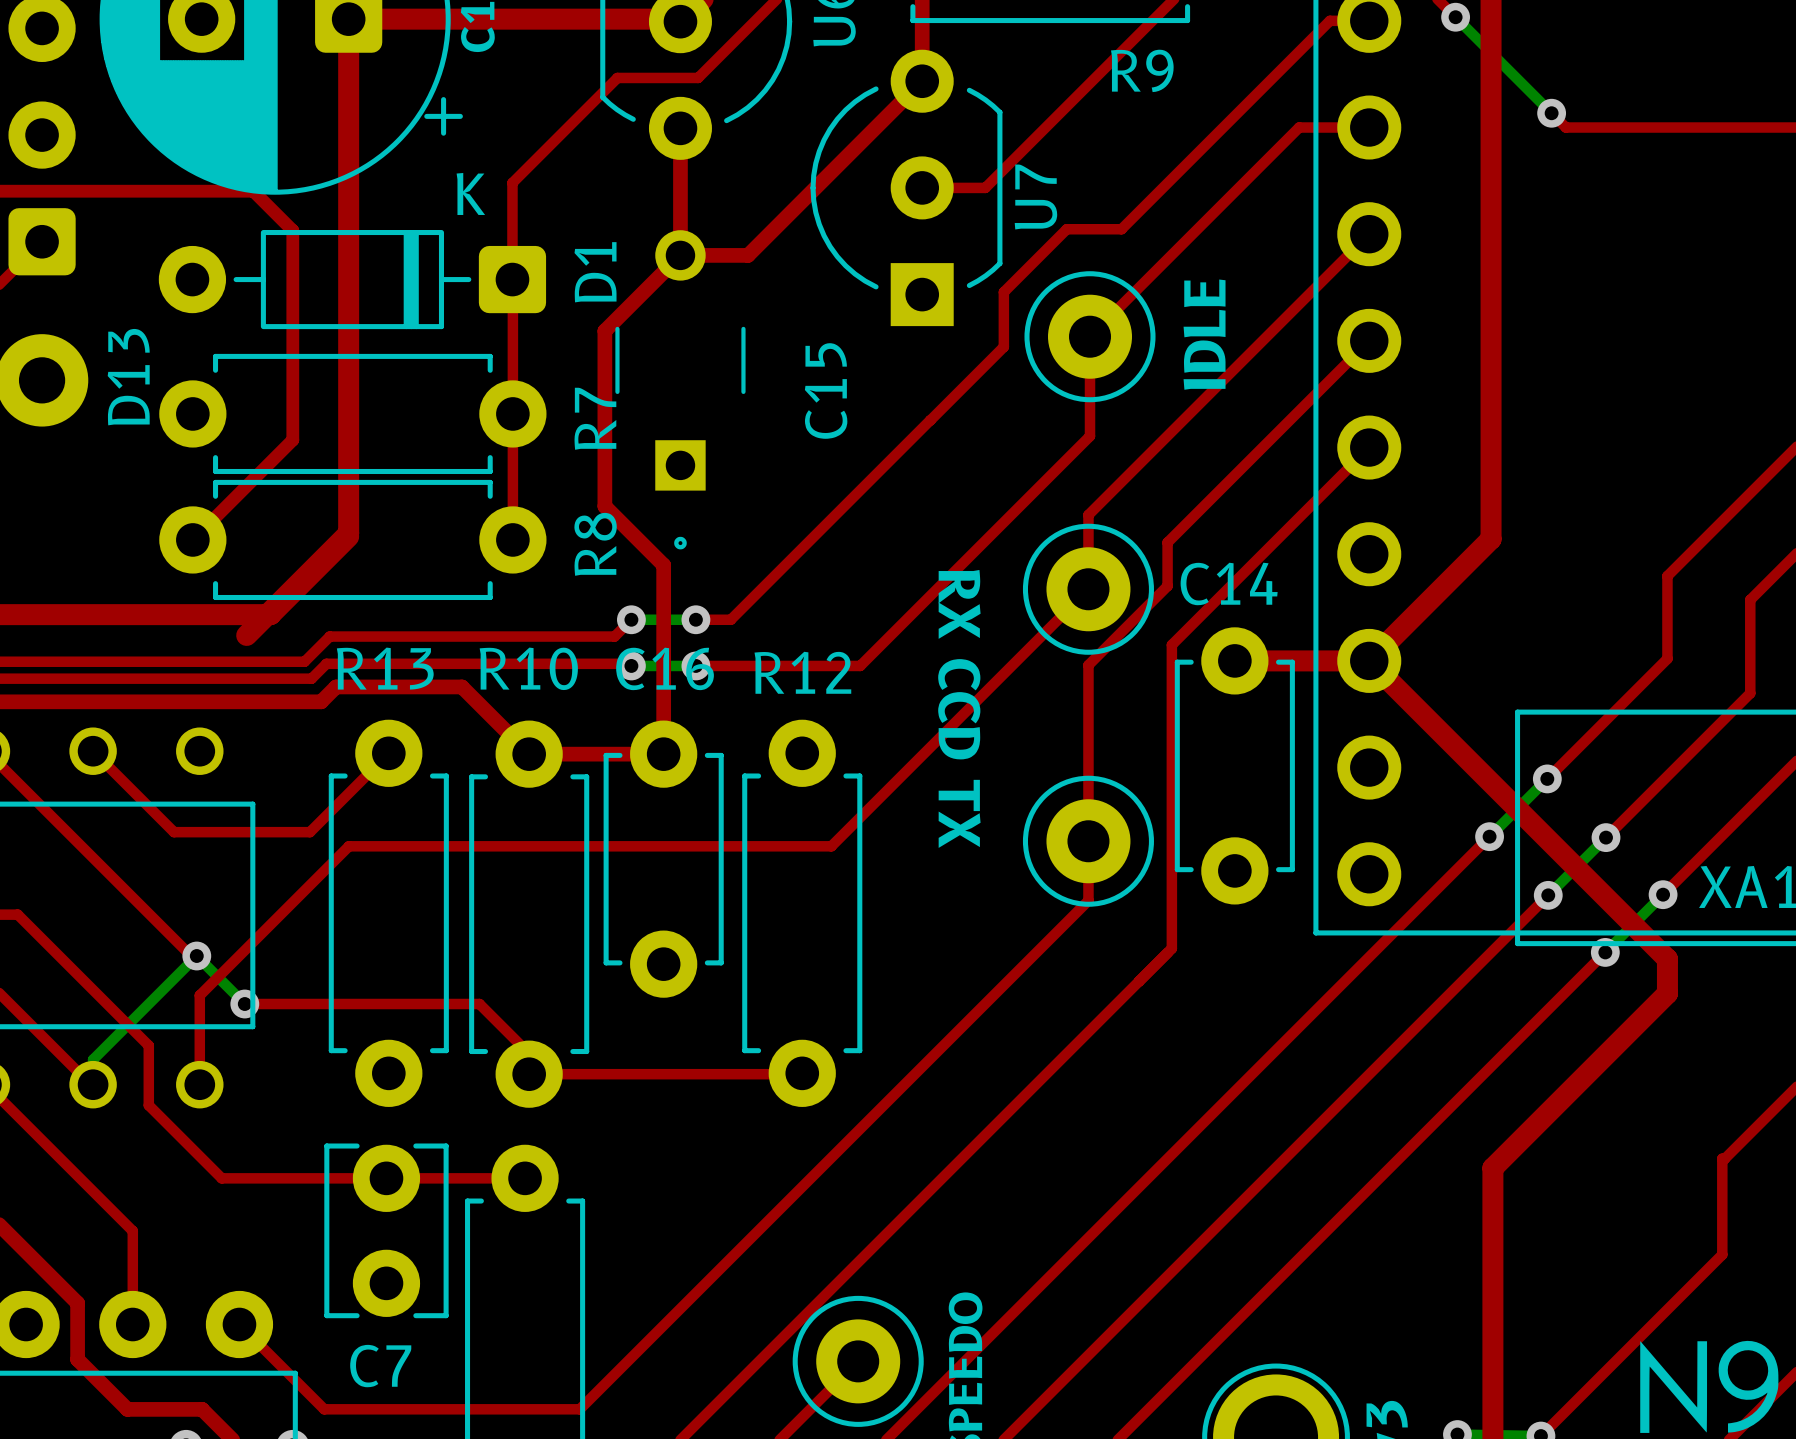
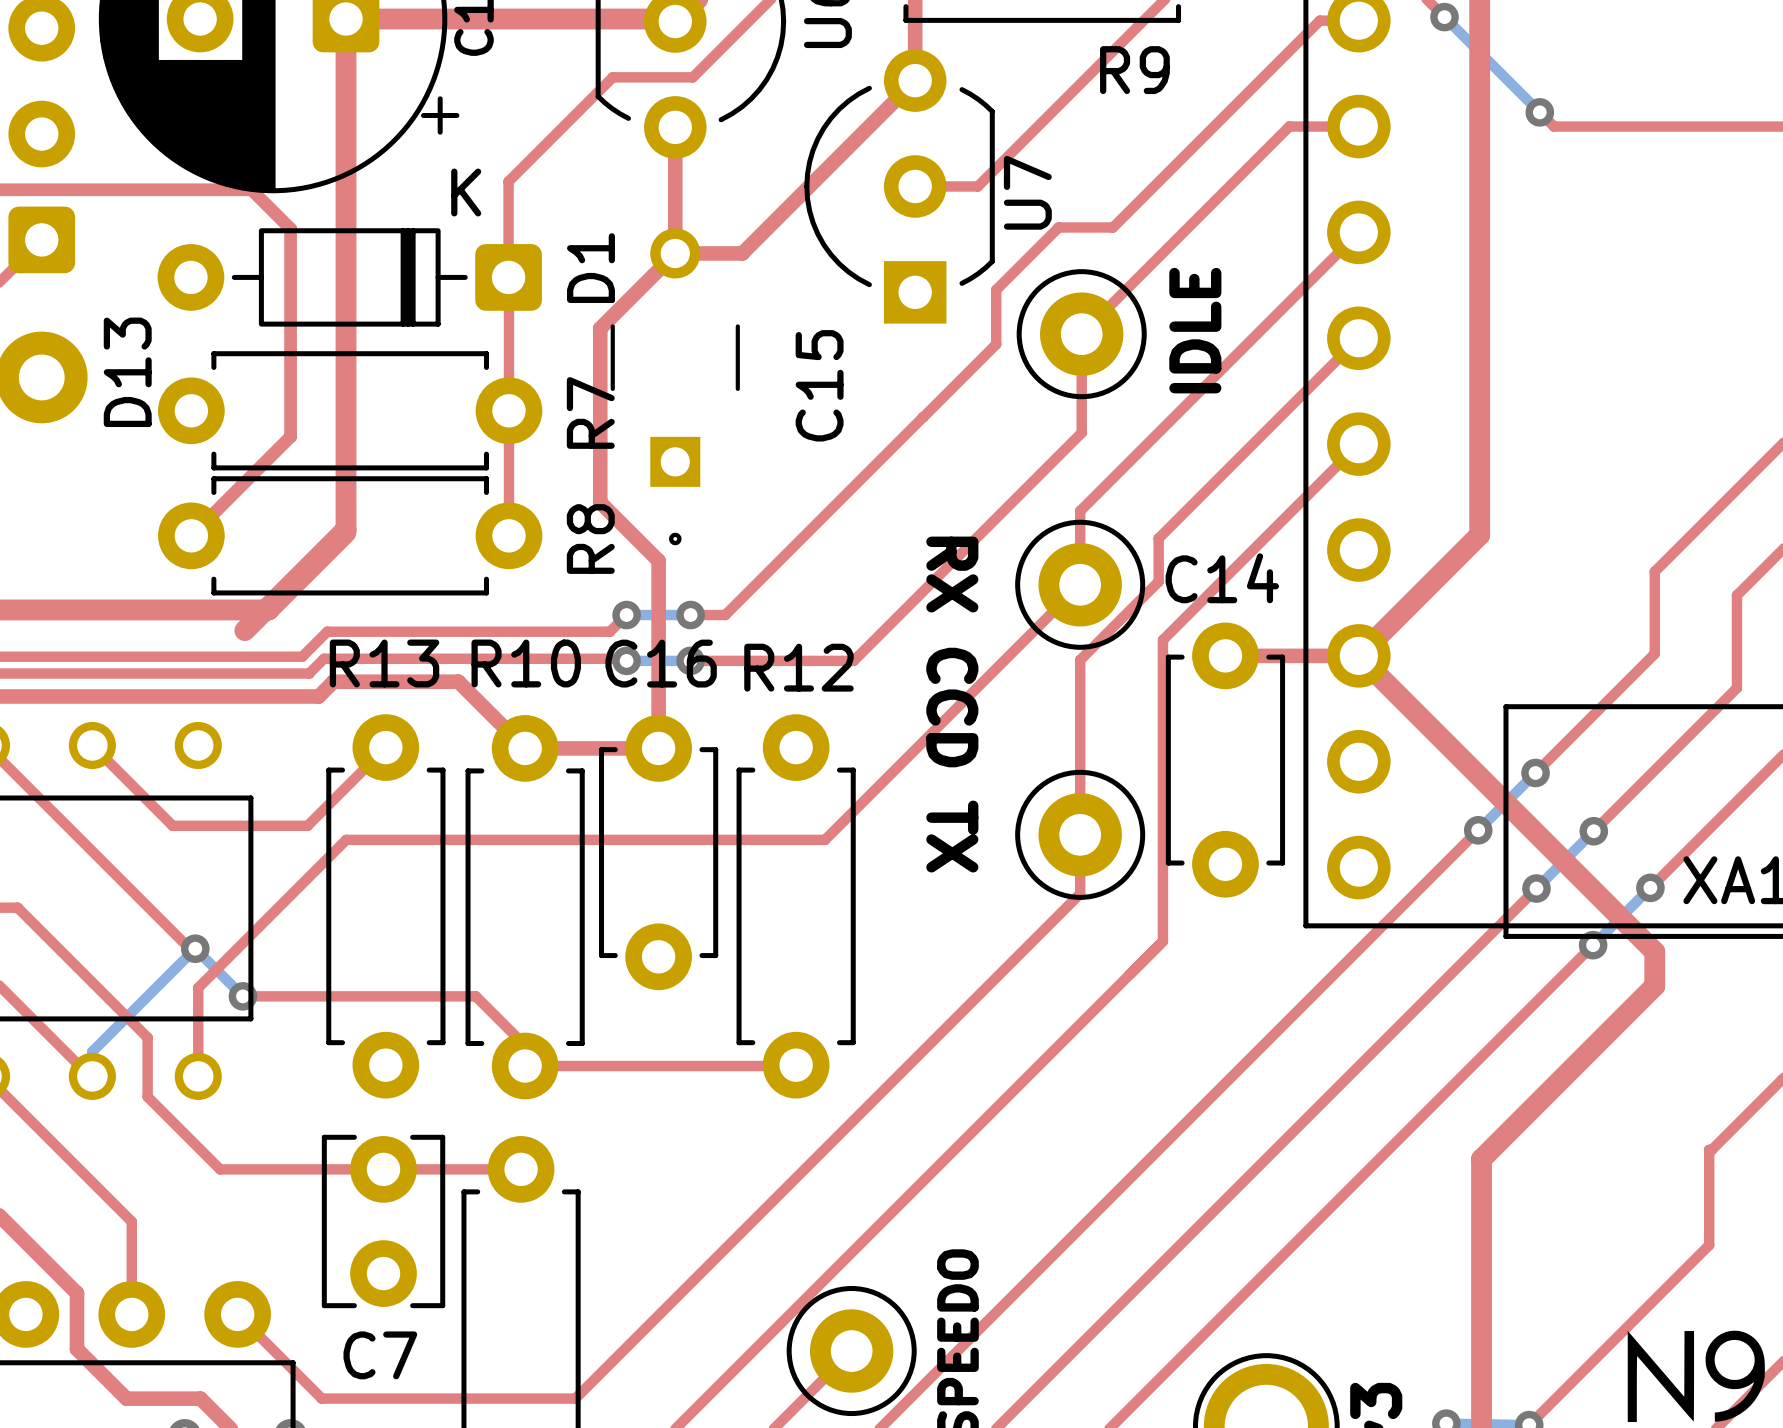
top track width: thick (1234, 660) (1369, 660) -> thin (1225, 655) (1358, 655)

